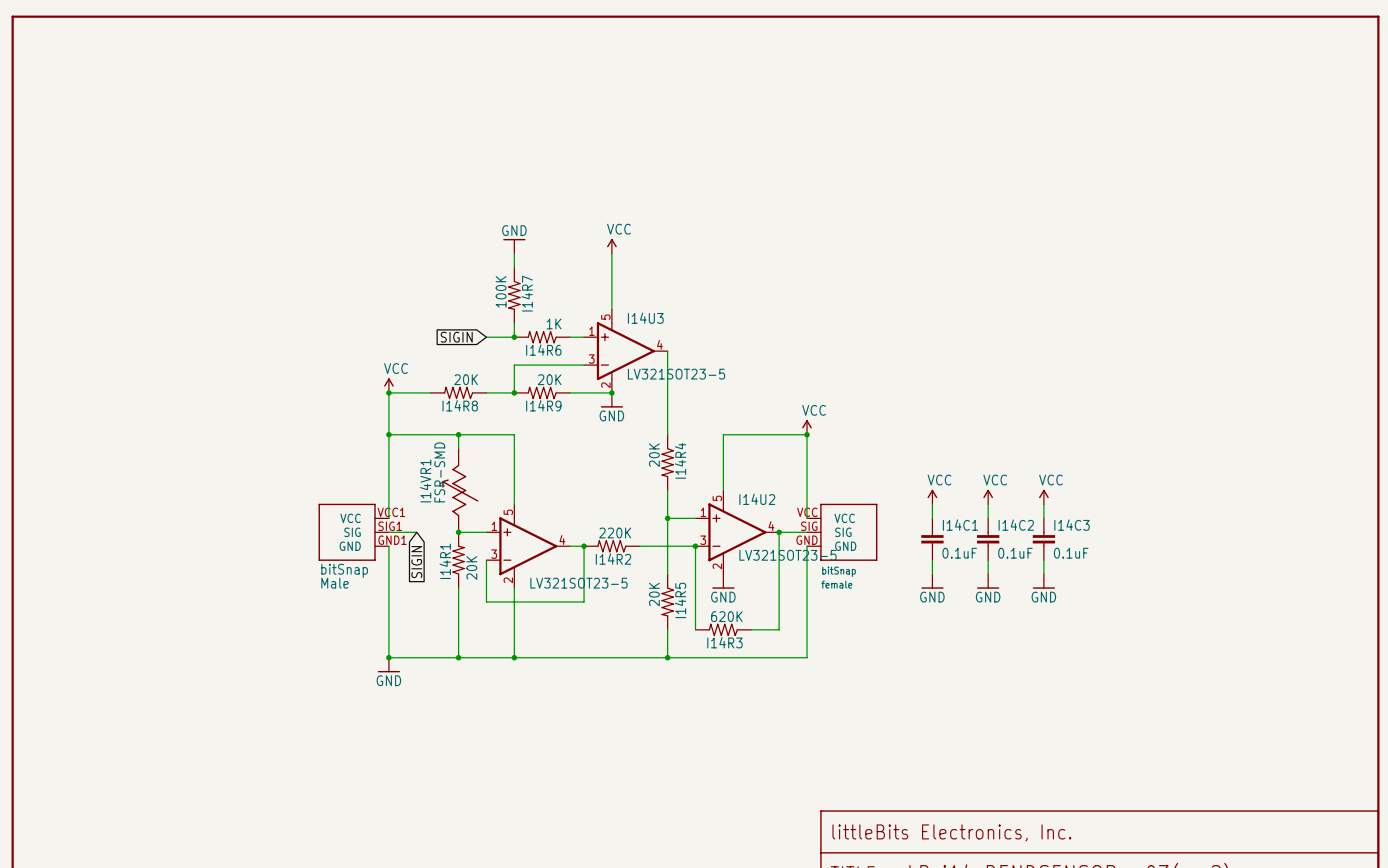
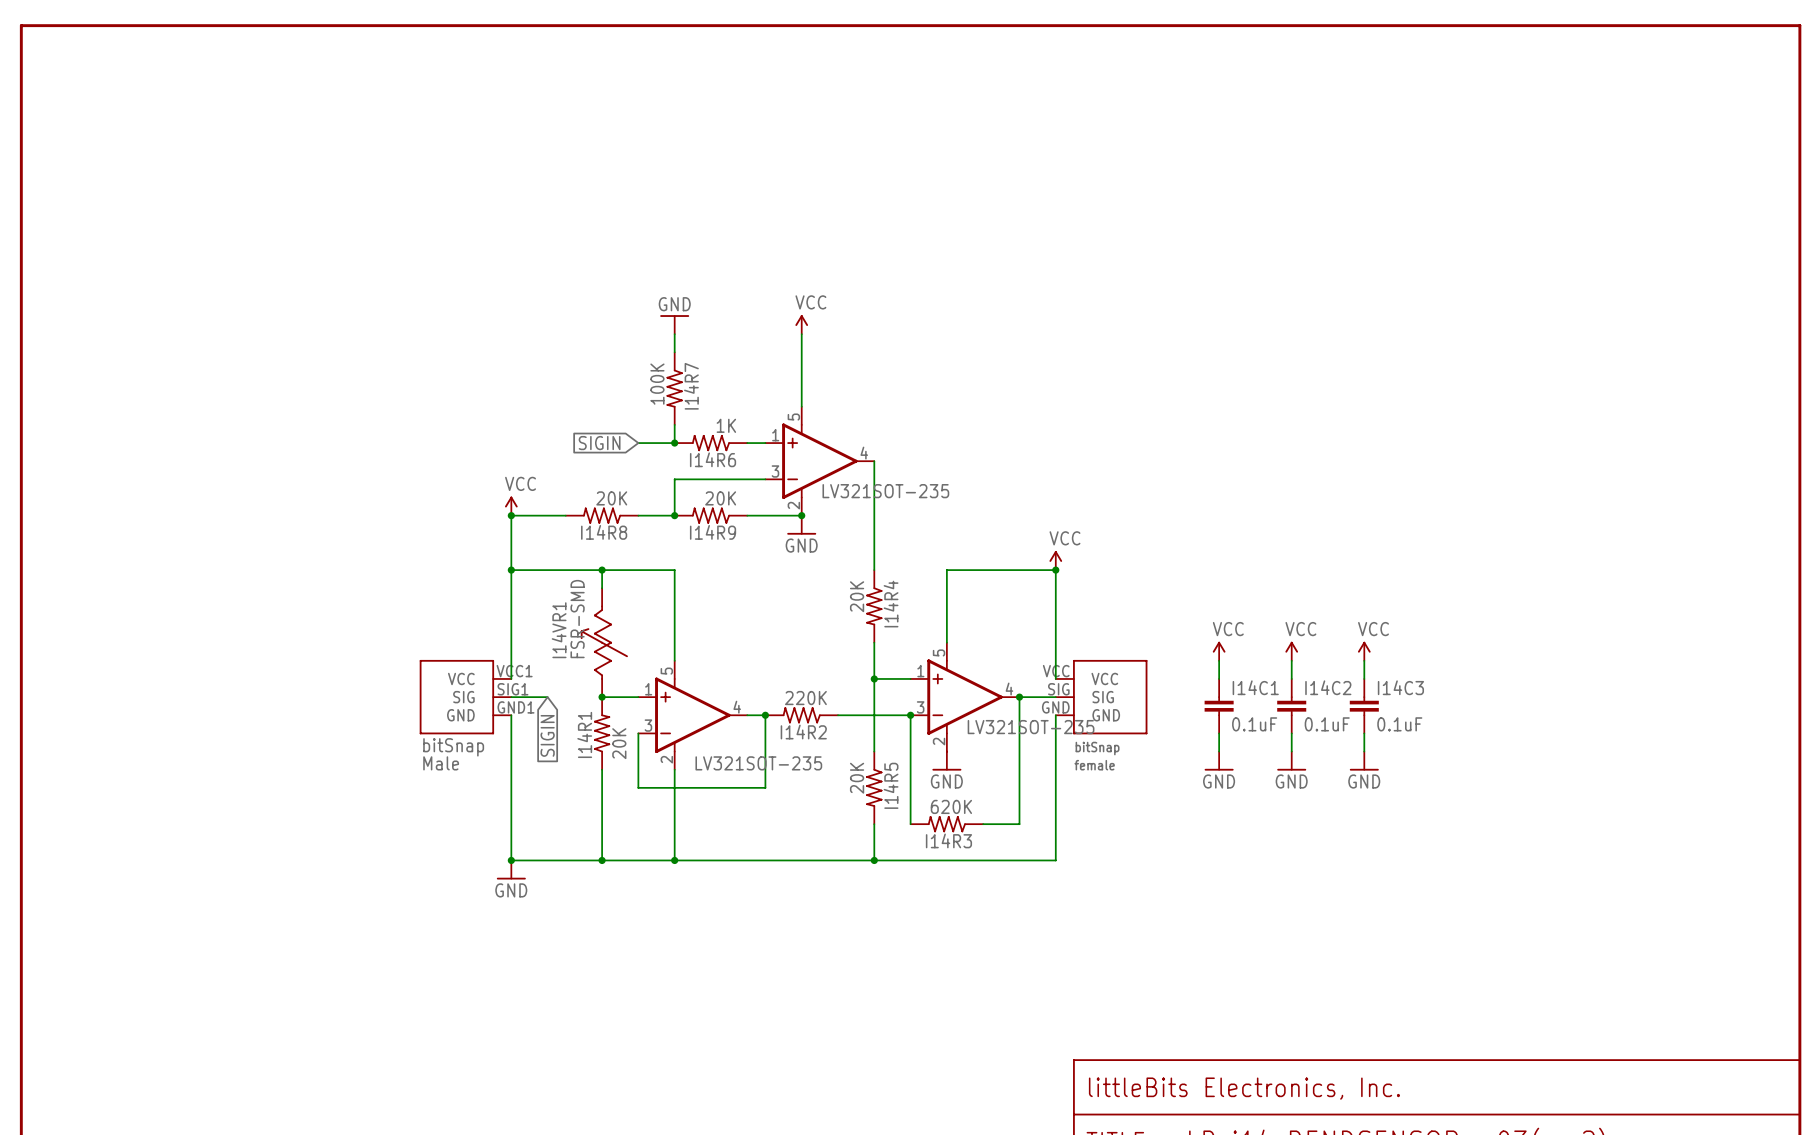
I14U3 name: I14U3 (645, 318) -> none
I14U3 value: LV321SOT23-5 (676, 374) -> LV321SOT-235 (885, 491)
I14U2 name: I14U2 (757, 499) -> none
I14U2 value: LV321SOT23-5 (788, 555) -> LV321SOT-235 (1031, 727)
part value: LV321SOT23-5 (578, 583) -> LV321SOT-235 (758, 763)

